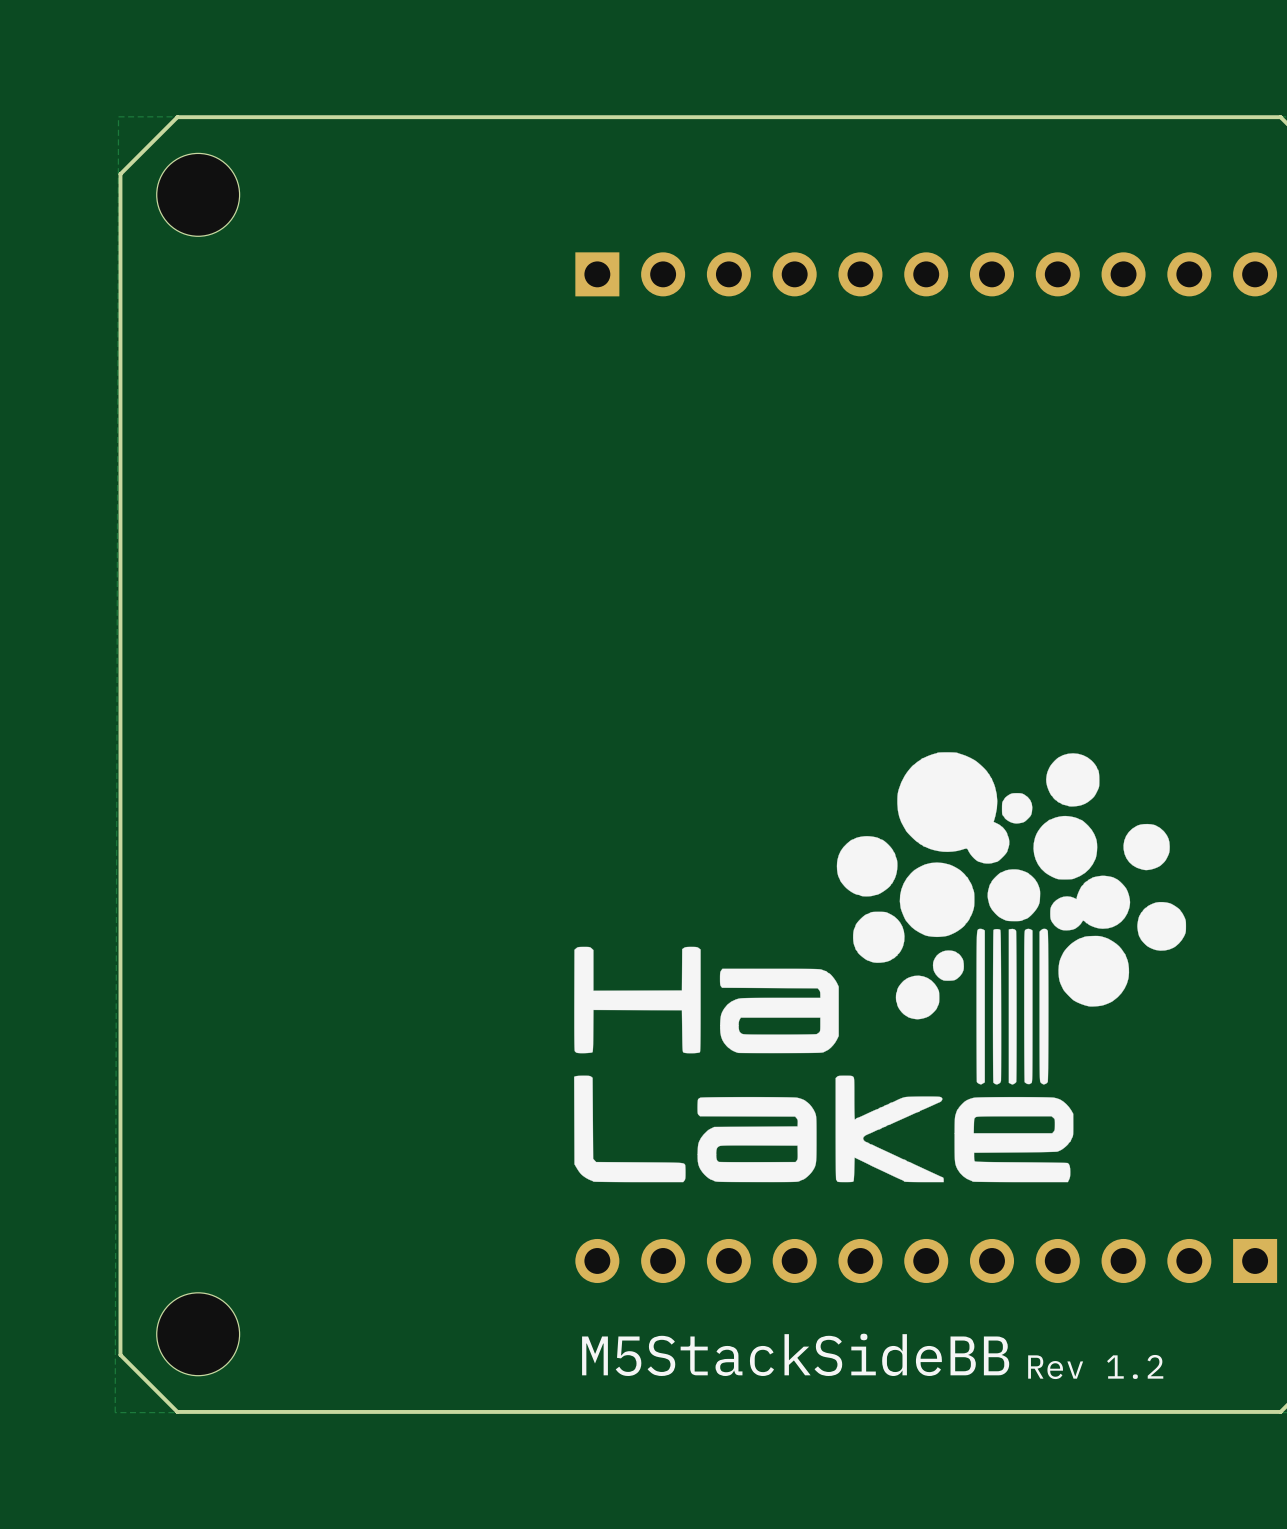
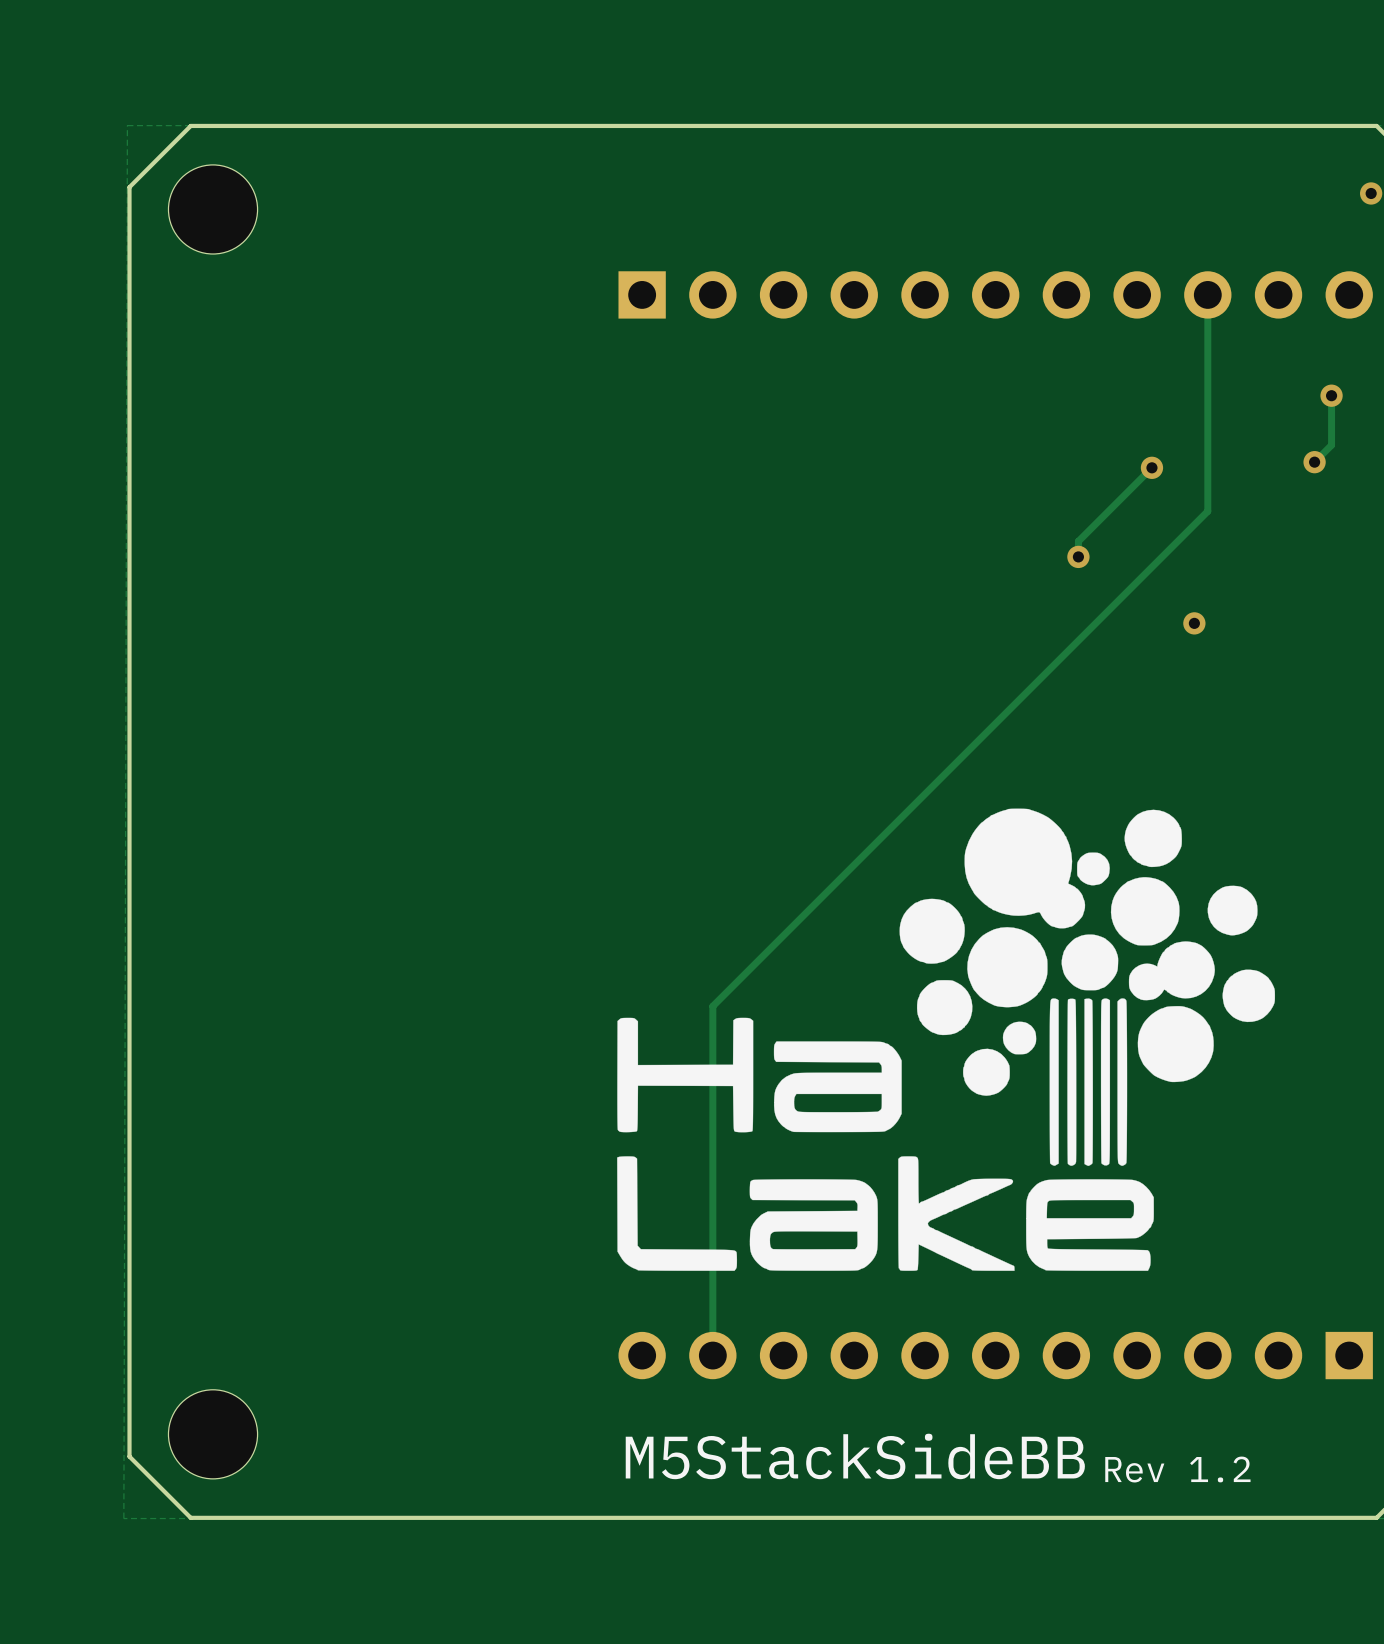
via: none -> (1371, 193)
track: none -> (1207, 294) (1207, 511) (712, 1006) (712, 1355)
track: none -> (1331, 395) (1331, 445) (1314, 462)
via: none -> (1331, 395)
via: none -> (1314, 462)
track: none -> (1151, 467) (1078, 541) (1078, 556)
via: none -> (1151, 467)
via: none -> (1078, 556)
via: none -> (1194, 623)

